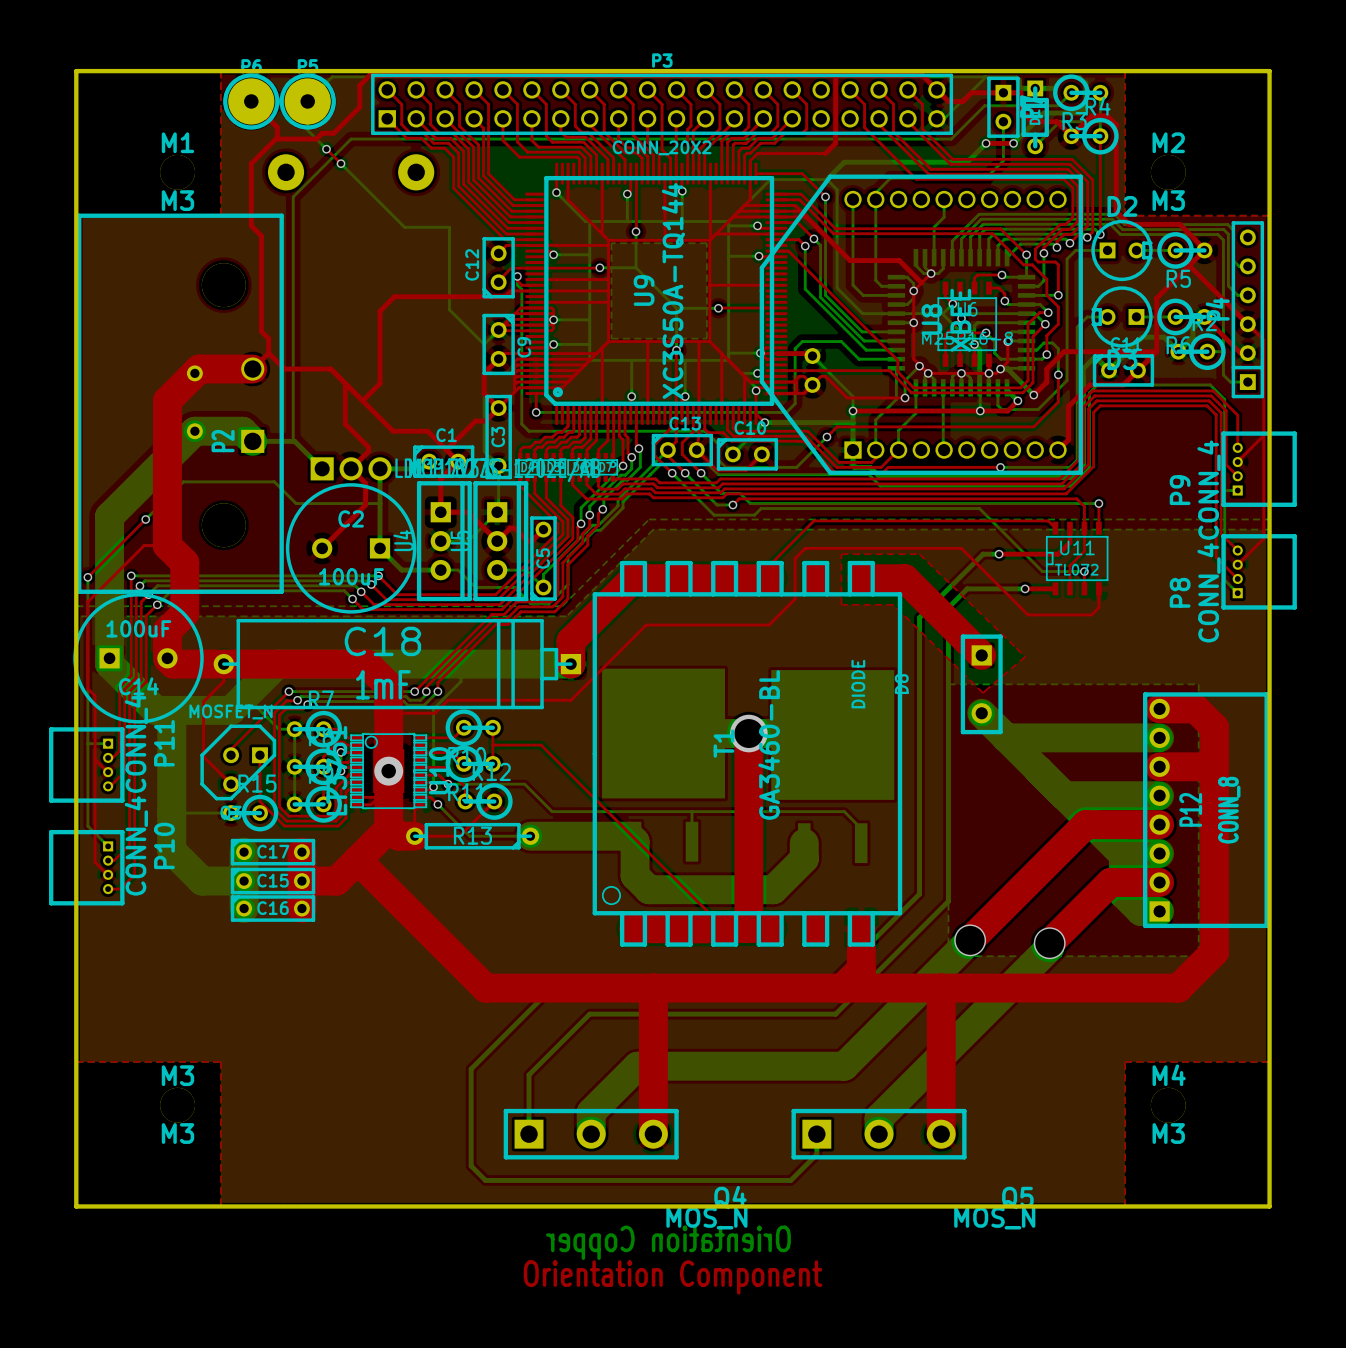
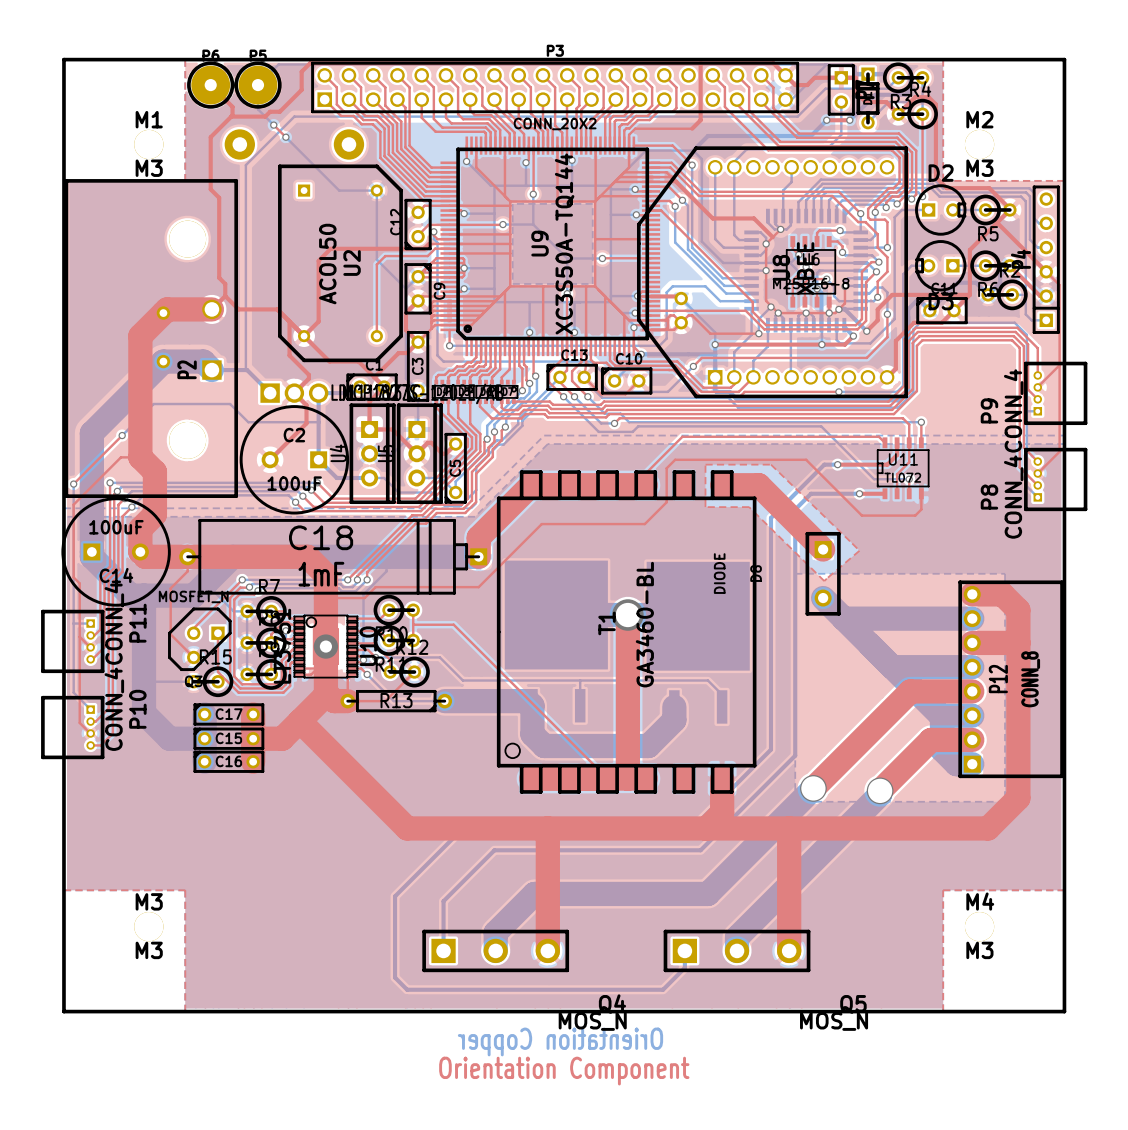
top track: none -> (449, 248) (435, 248) (427, 256) (385, 256) (376, 264) (376, 336)
U2: none -> ACOL50 (340, 263)

